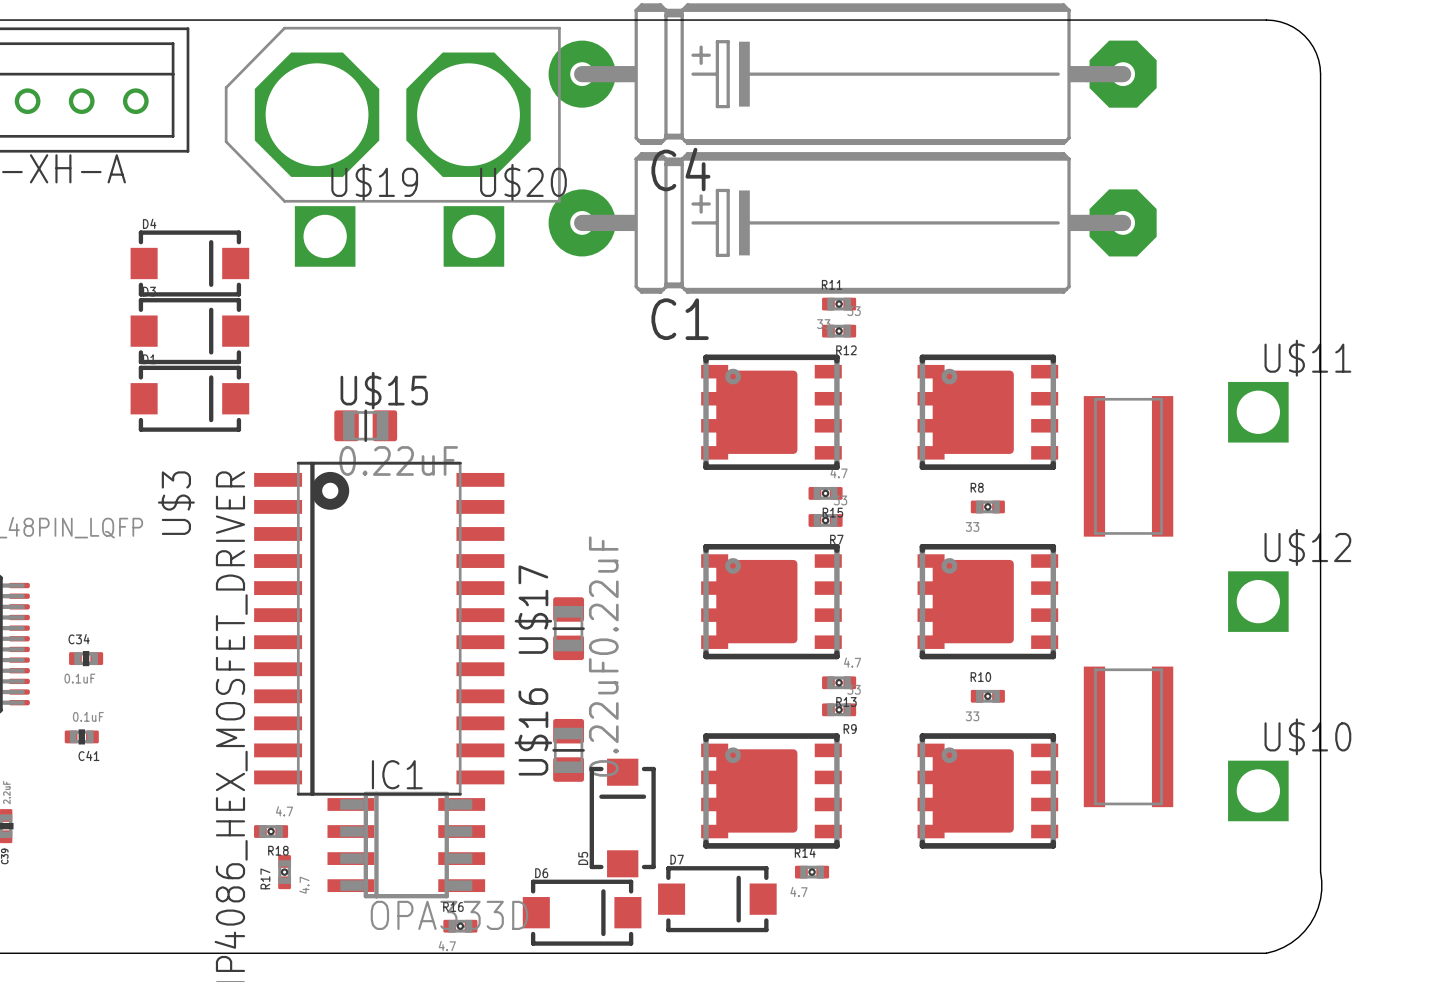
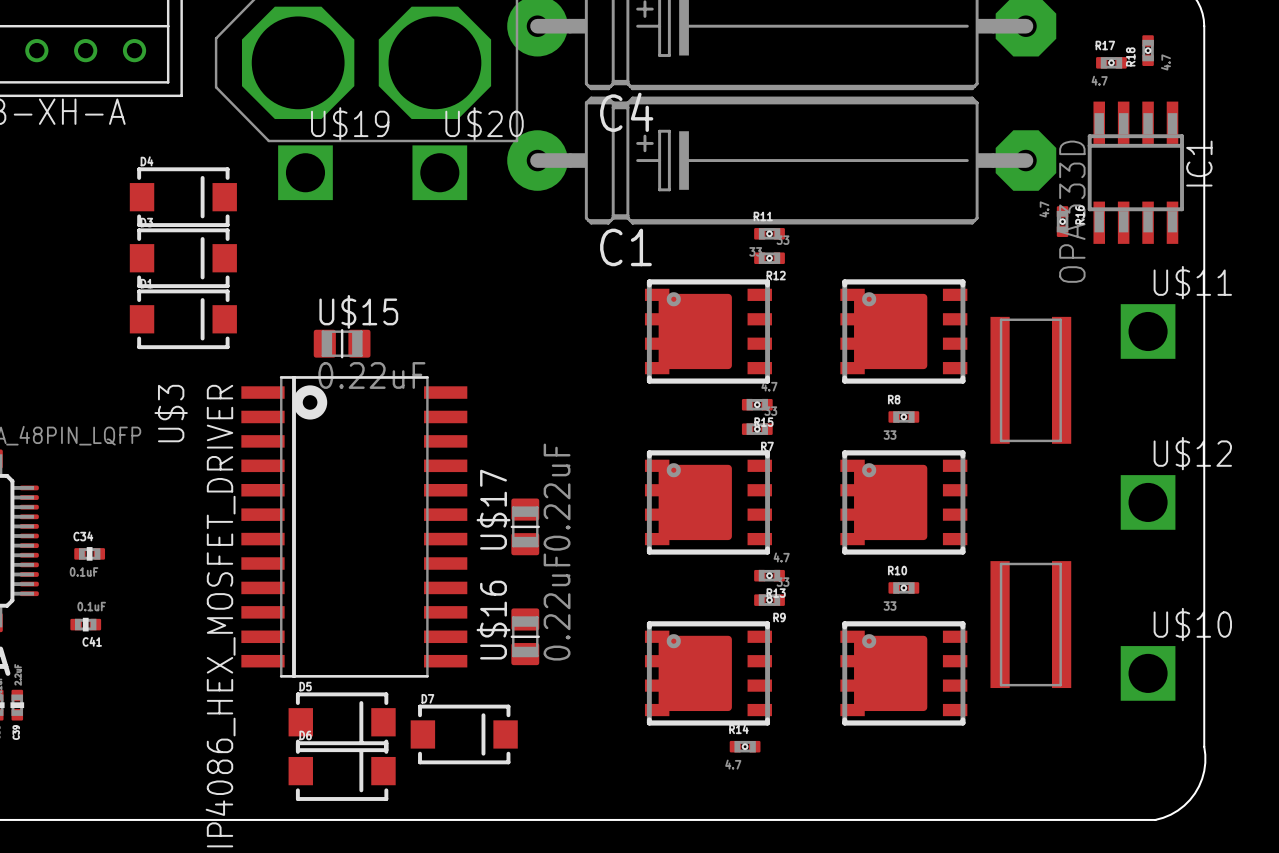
D5 rotation: 0° (622, 818) -> 90° clockwise (342, 722)
D5 position: (622, 818) -> (342, 722)
R18 rotation: 0° (271, 831) -> 90° clockwise (1148, 50)
R18 position: (271, 831) -> (1148, 50)
IC1 rotation: 0° (406, 845) -> 90° clockwise (1135, 172)
IC1 position: (406, 845) -> (1135, 172)
R17 rotation: 0° (284, 872) -> 90° clockwise (1111, 62)
R17 position: (284, 872) -> (1111, 62)
D7 position: (717, 899) -> (464, 734)
D6 position: (582, 912) -> (342, 771)
R16 rotation: 0° (460, 926) -> 90° clockwise (1062, 221)
R16 position: (460, 926) -> (1062, 221)

